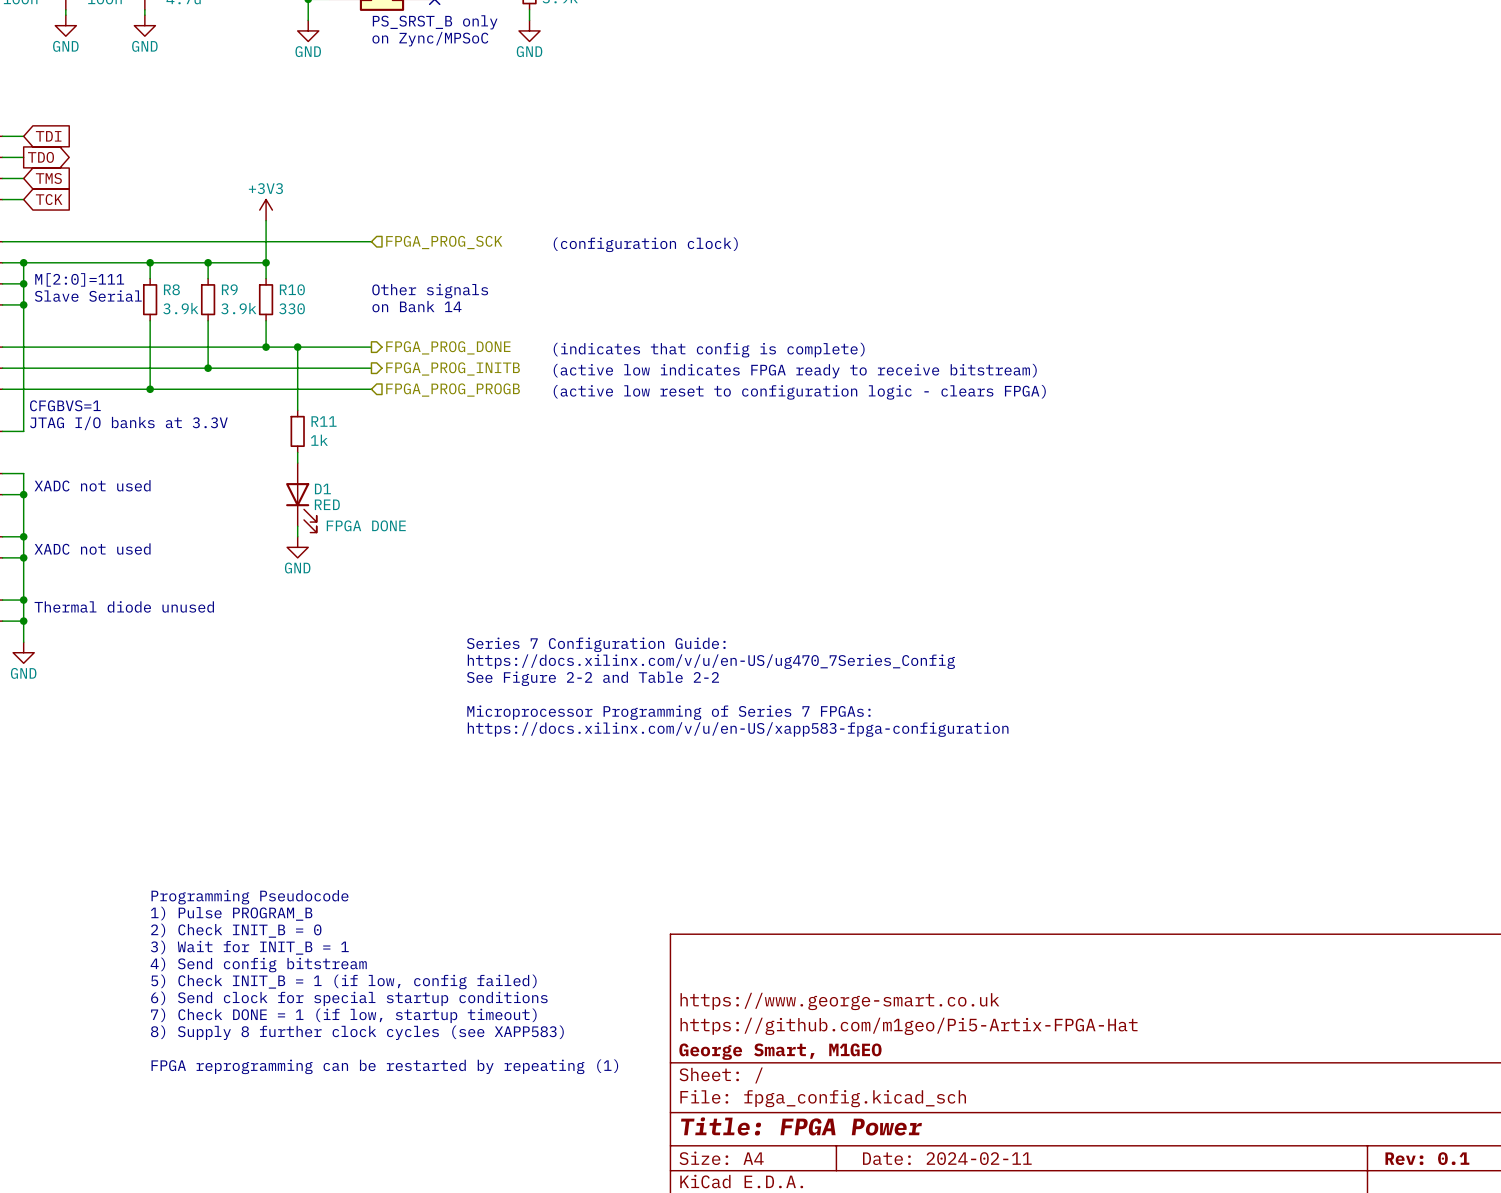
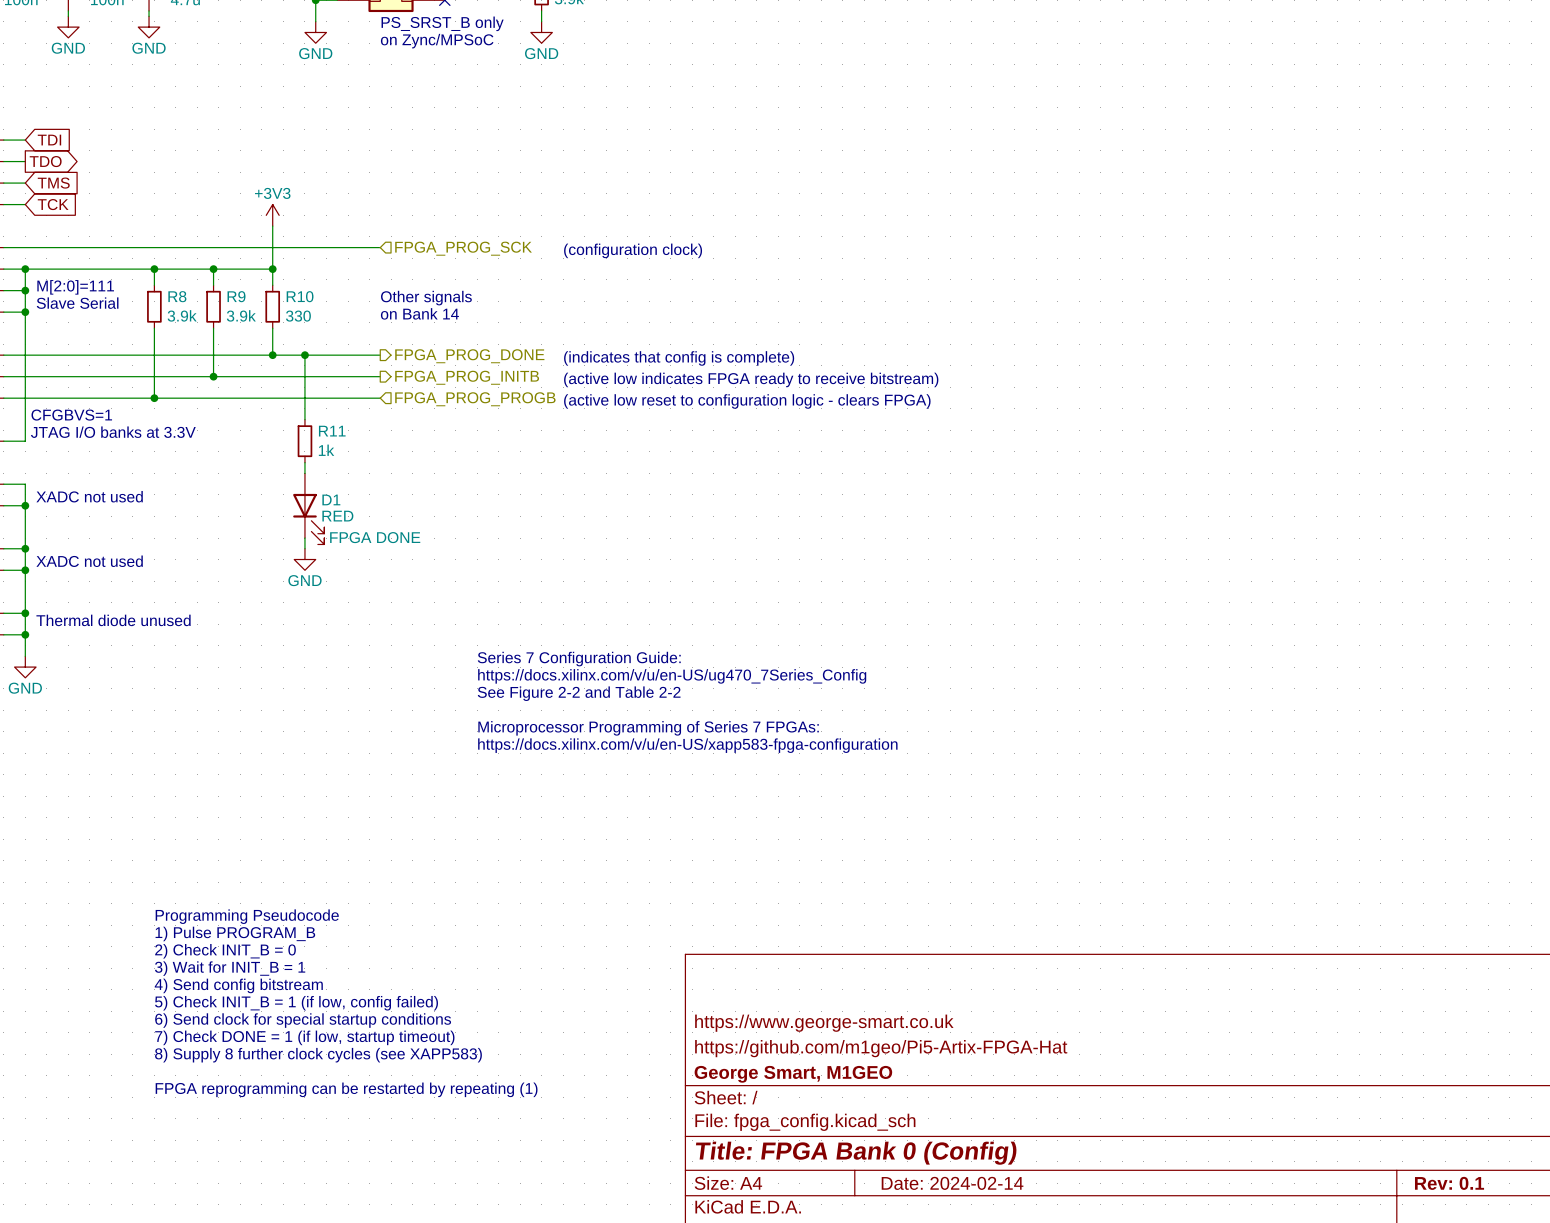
title block: Title: FPGA Power (801, 1126) -> Title: FPGA Bank 0 (Config) (856, 1153)
title block: Date: 2024-02-11 (947, 1158) -> Date: 2024-02-14 (952, 1183)

